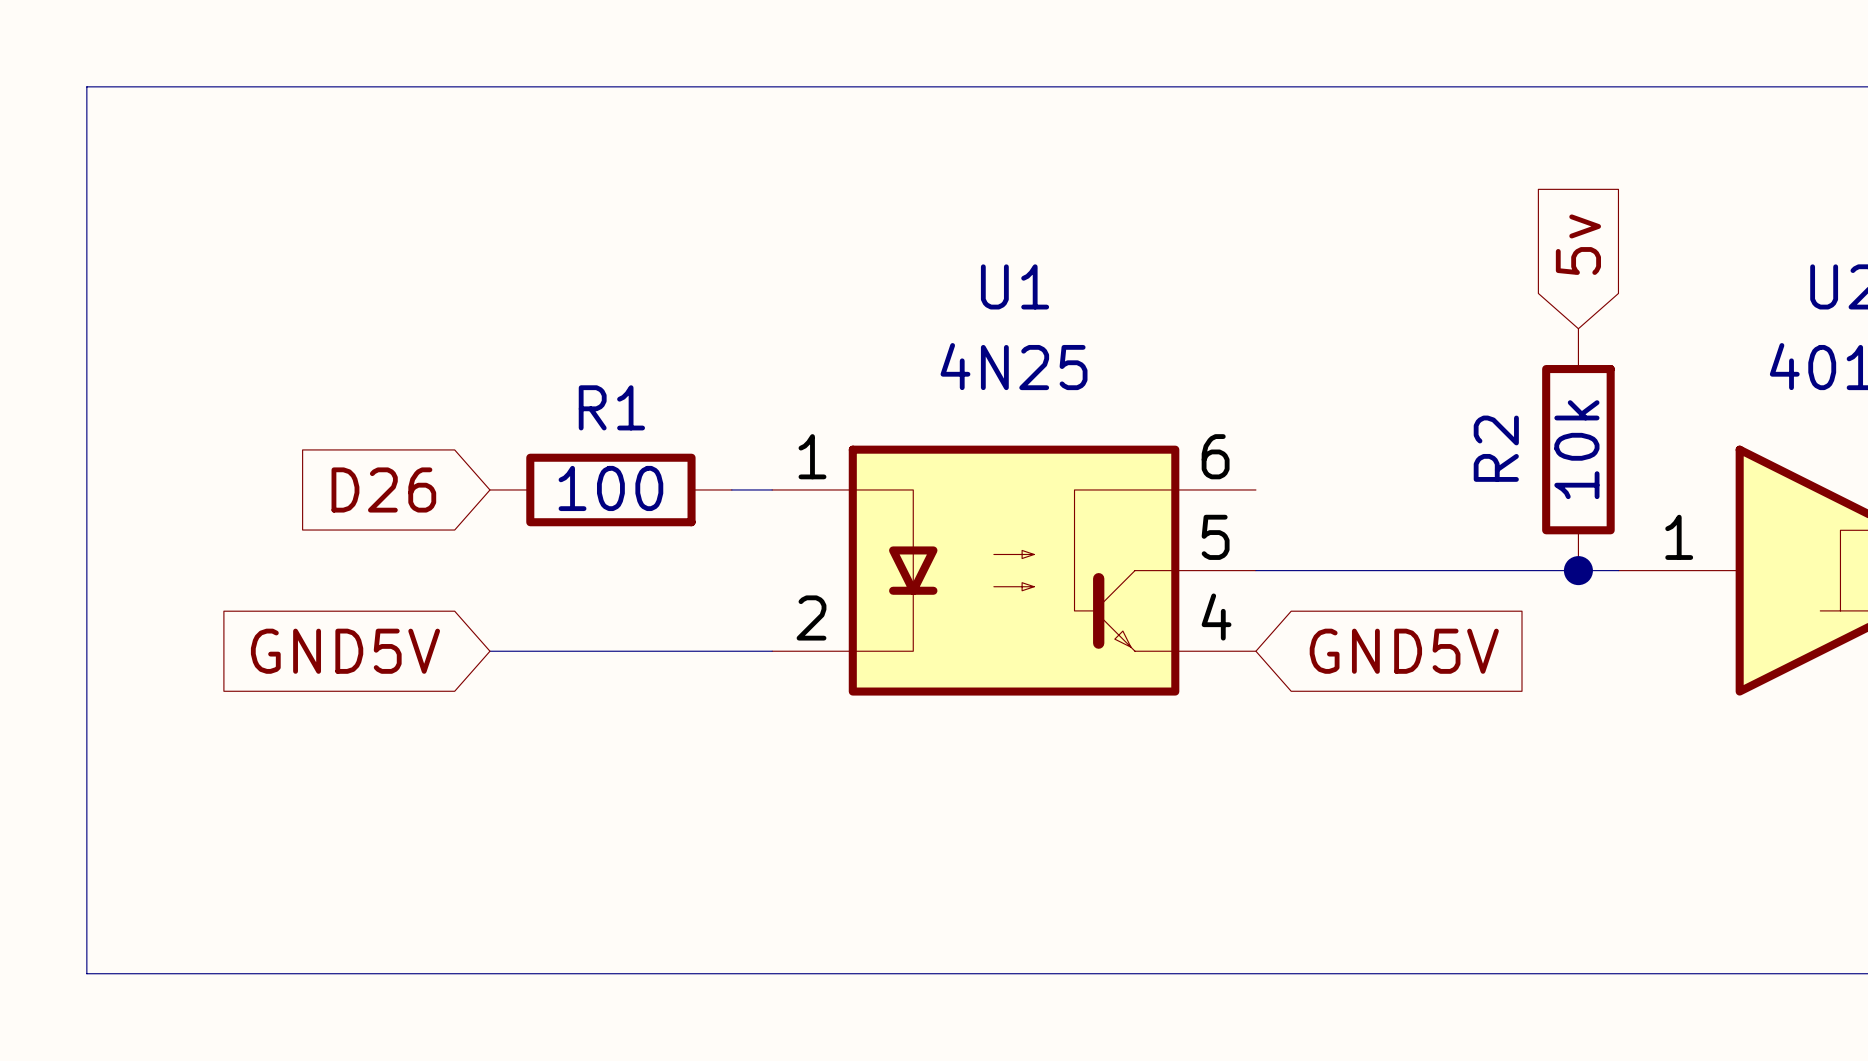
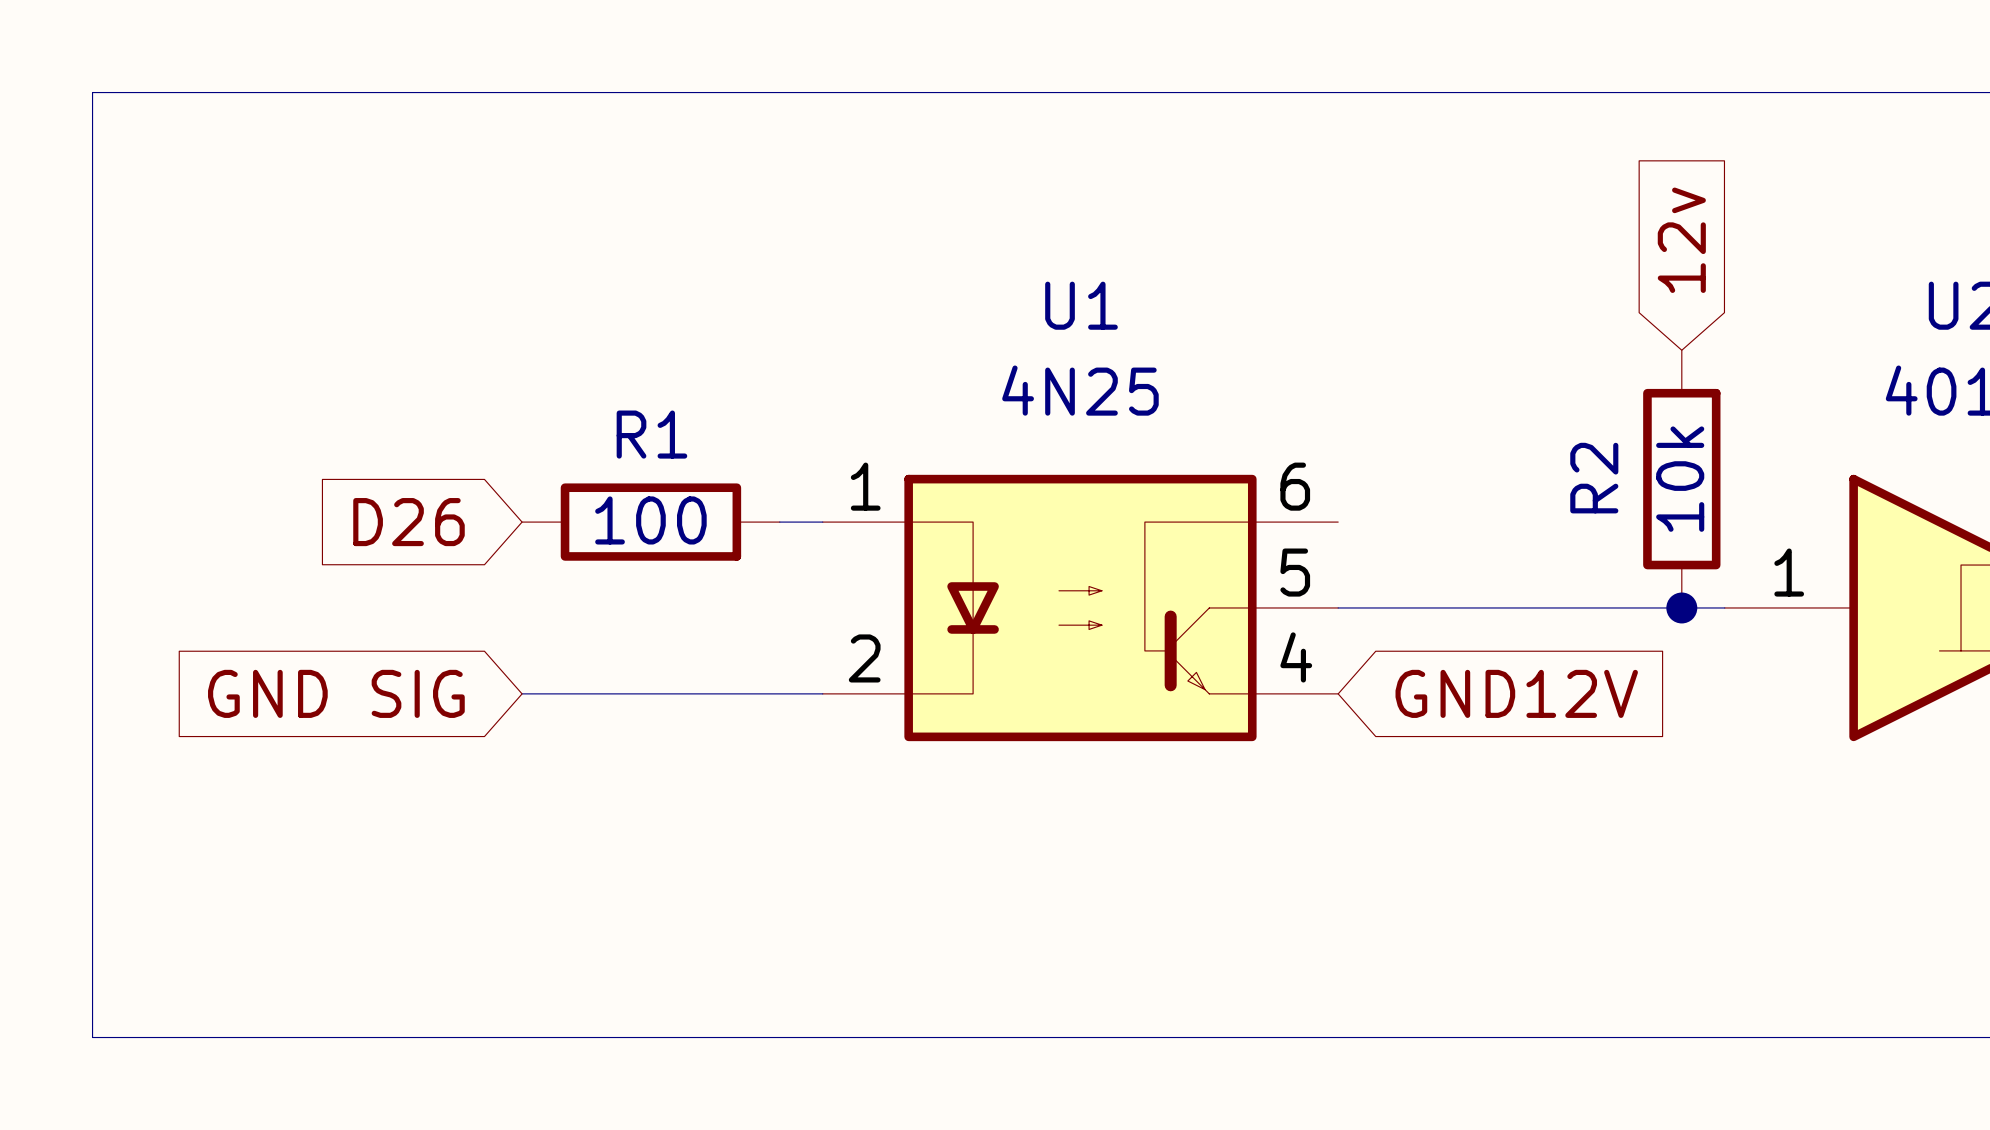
global label: 5v (1578, 244) -> 12v (1681, 240)
global label: GND5V (345, 651) -> GND SIG (336, 693)
global label: GND5V (1404, 651) -> GND12V (1516, 693)

